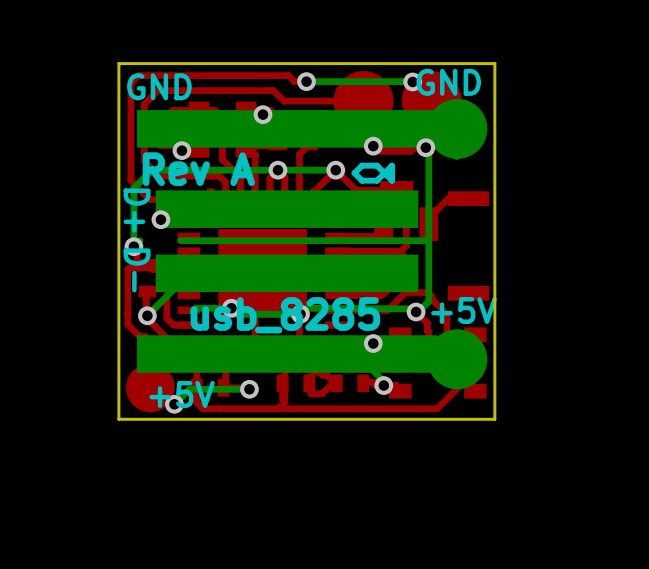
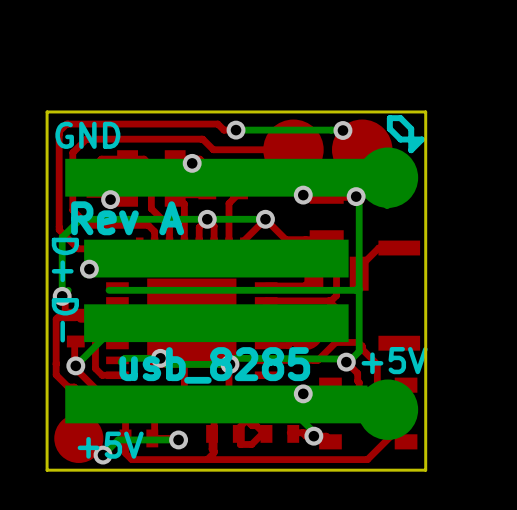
line: none -> (400, 118) (411, 128) (411, 150) (421, 139) (400, 139) (389, 128) (389, 118) (400, 118)
part value: GND (448, 82) -> none
line: (392, 165) (377, 180) (362, 180) (354, 173) (362, 165) (377, 165) (392, 180) (392, 165) -> none

